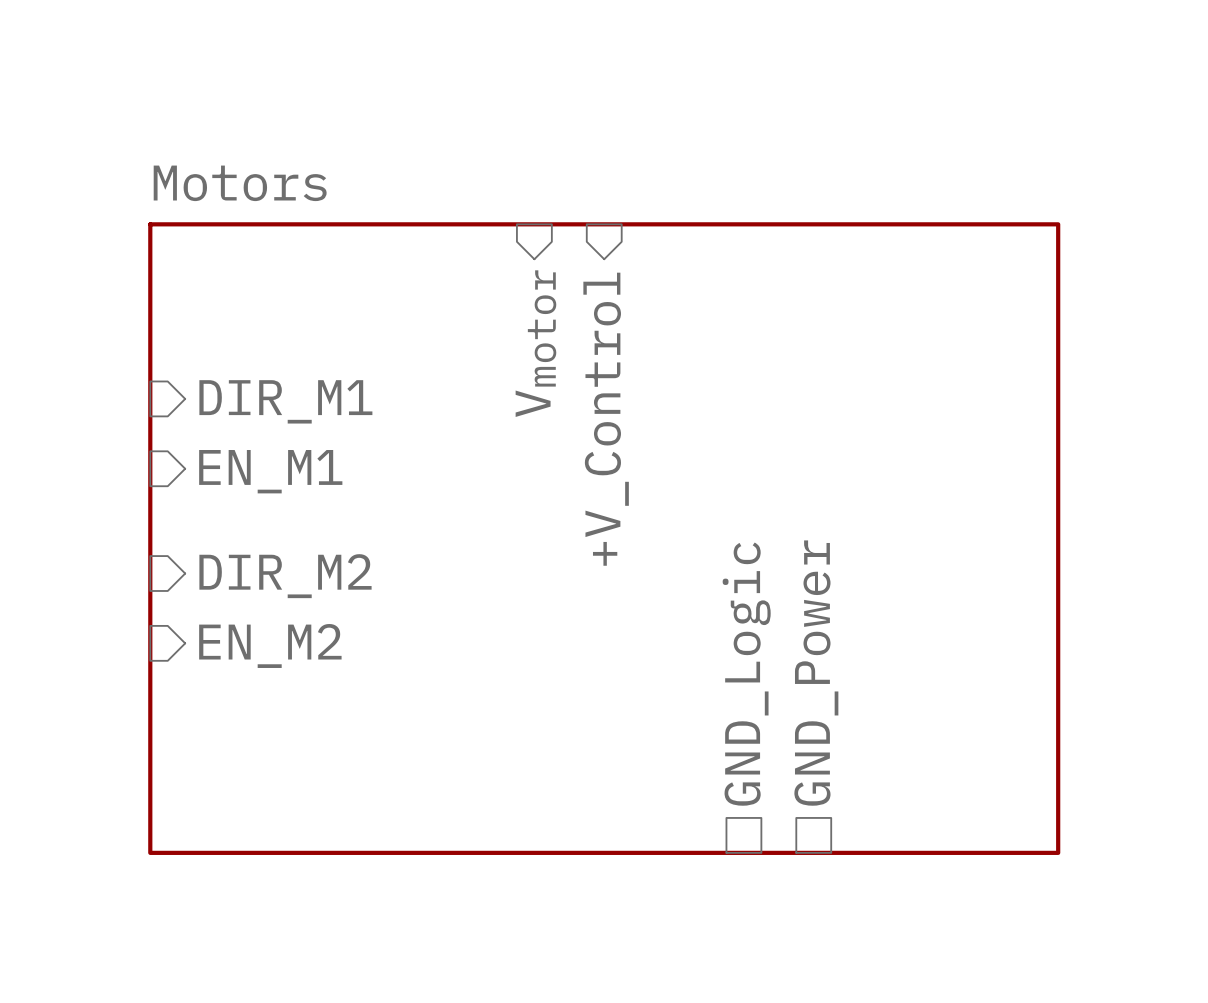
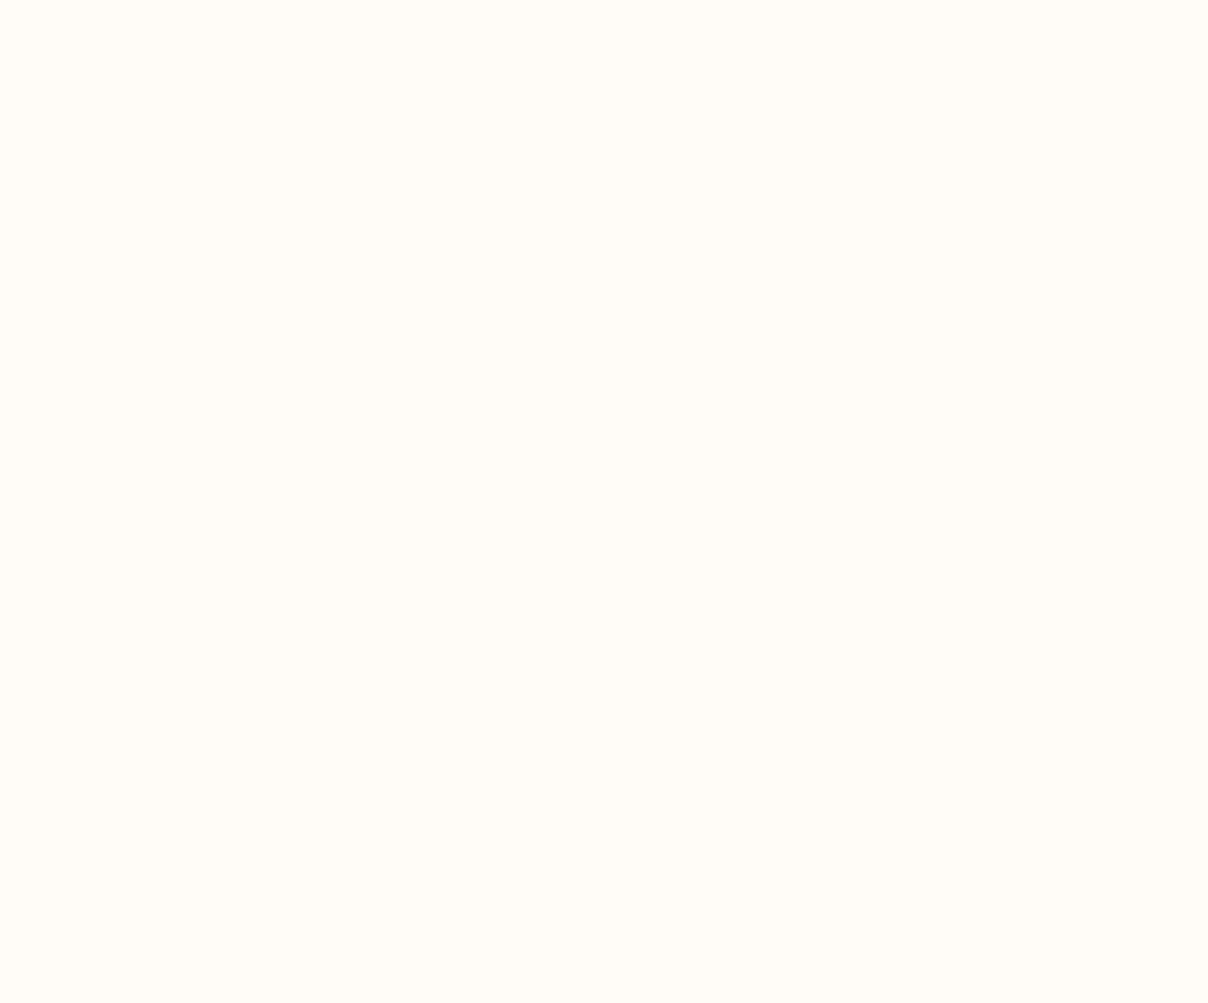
sheet pin: Vmotor (535, 343) -> none
sheet pin: DIR_M1 (285, 401) -> none
sheet pin: +V_Control (606, 419) -> none
sheet pin: EN_M1 (270, 471) -> none
sheet Motors: (604, 538) -> none
sheet pin: DIR_M2 (285, 576) -> none
sheet pin: EN_M2 (270, 645) -> none
sheet pin: GND_Power (816, 673) -> none
sheet pin: GND_Logic (746, 674) -> none

